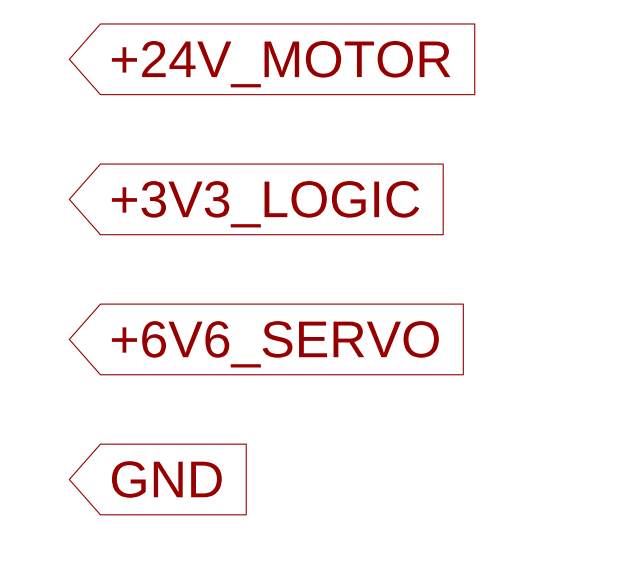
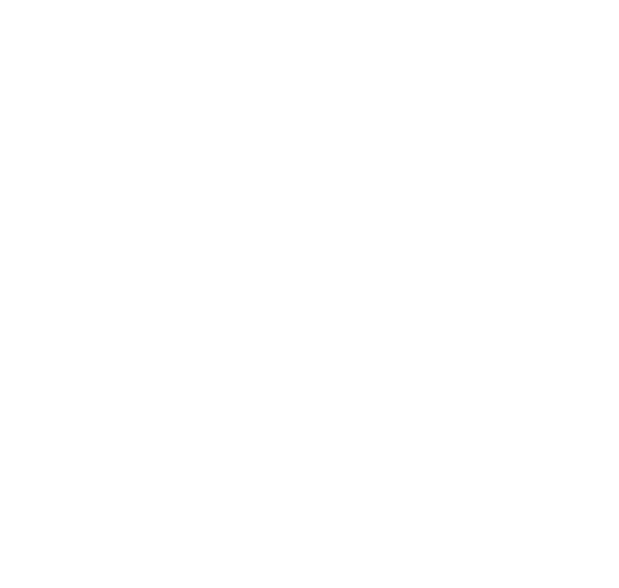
global label: +24V_MOTOR (281, 64) -> none
global label: +3V3_LOGIC (265, 204) -> none
global label: +6V6_SERVO (275, 344) -> none
global label: GND (166, 479) -> none

